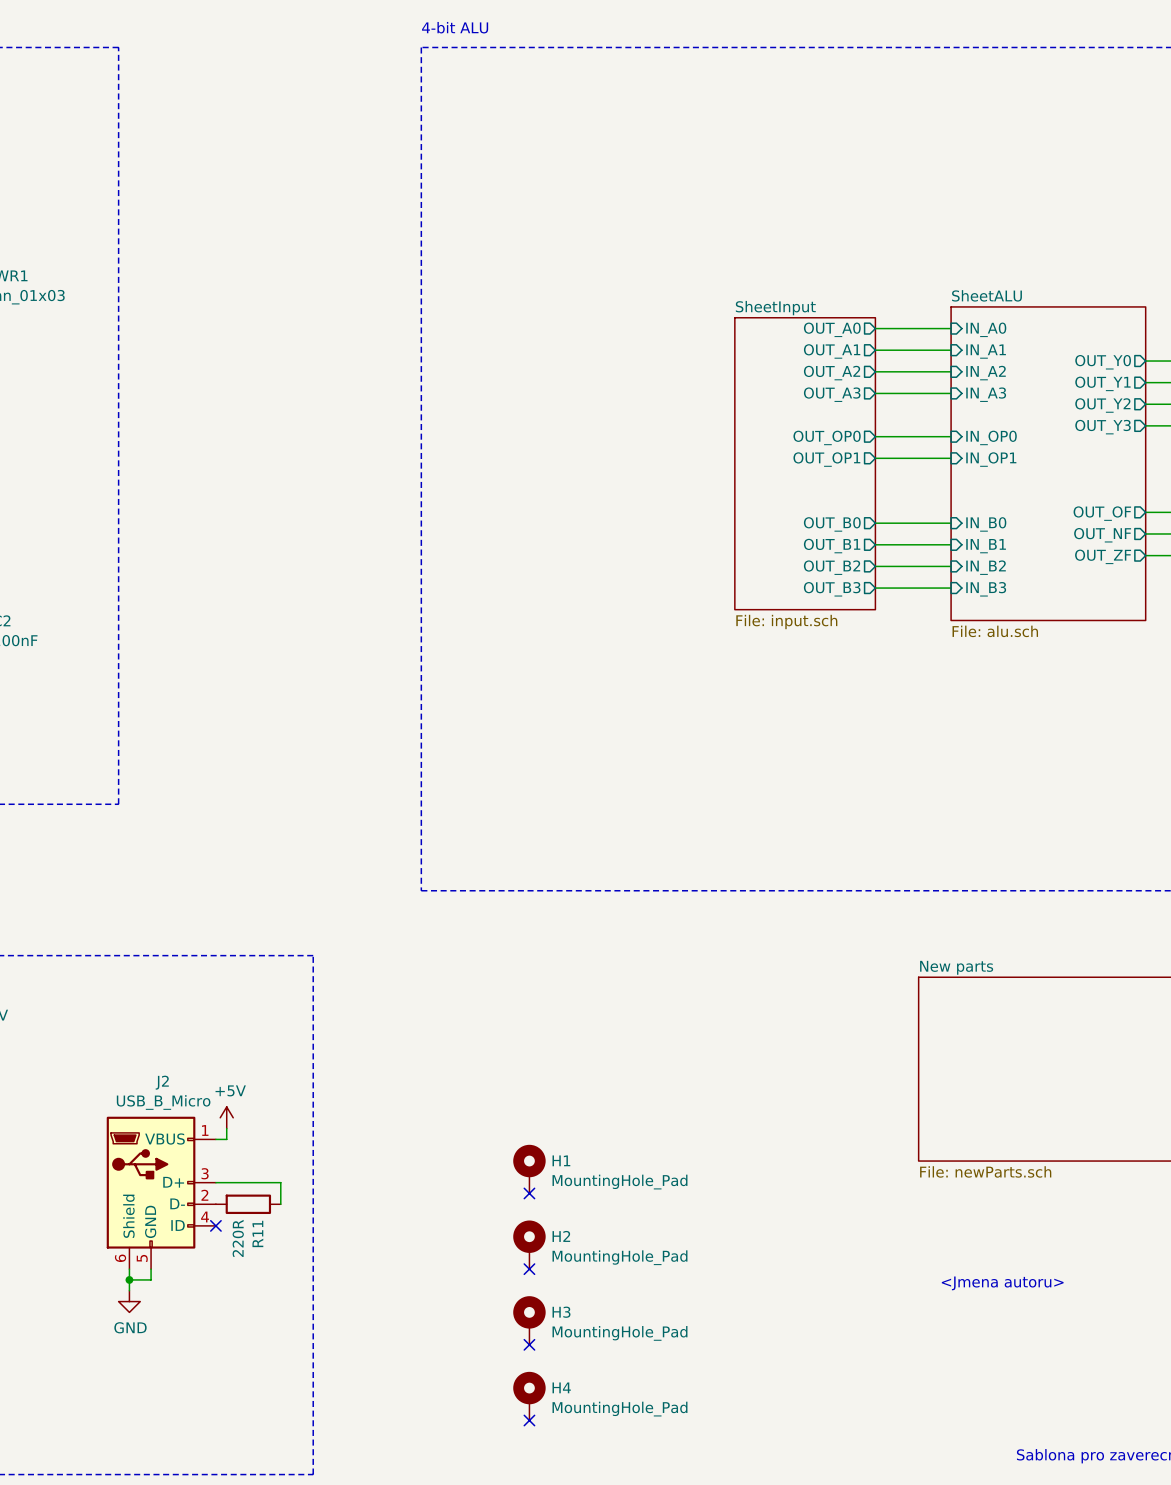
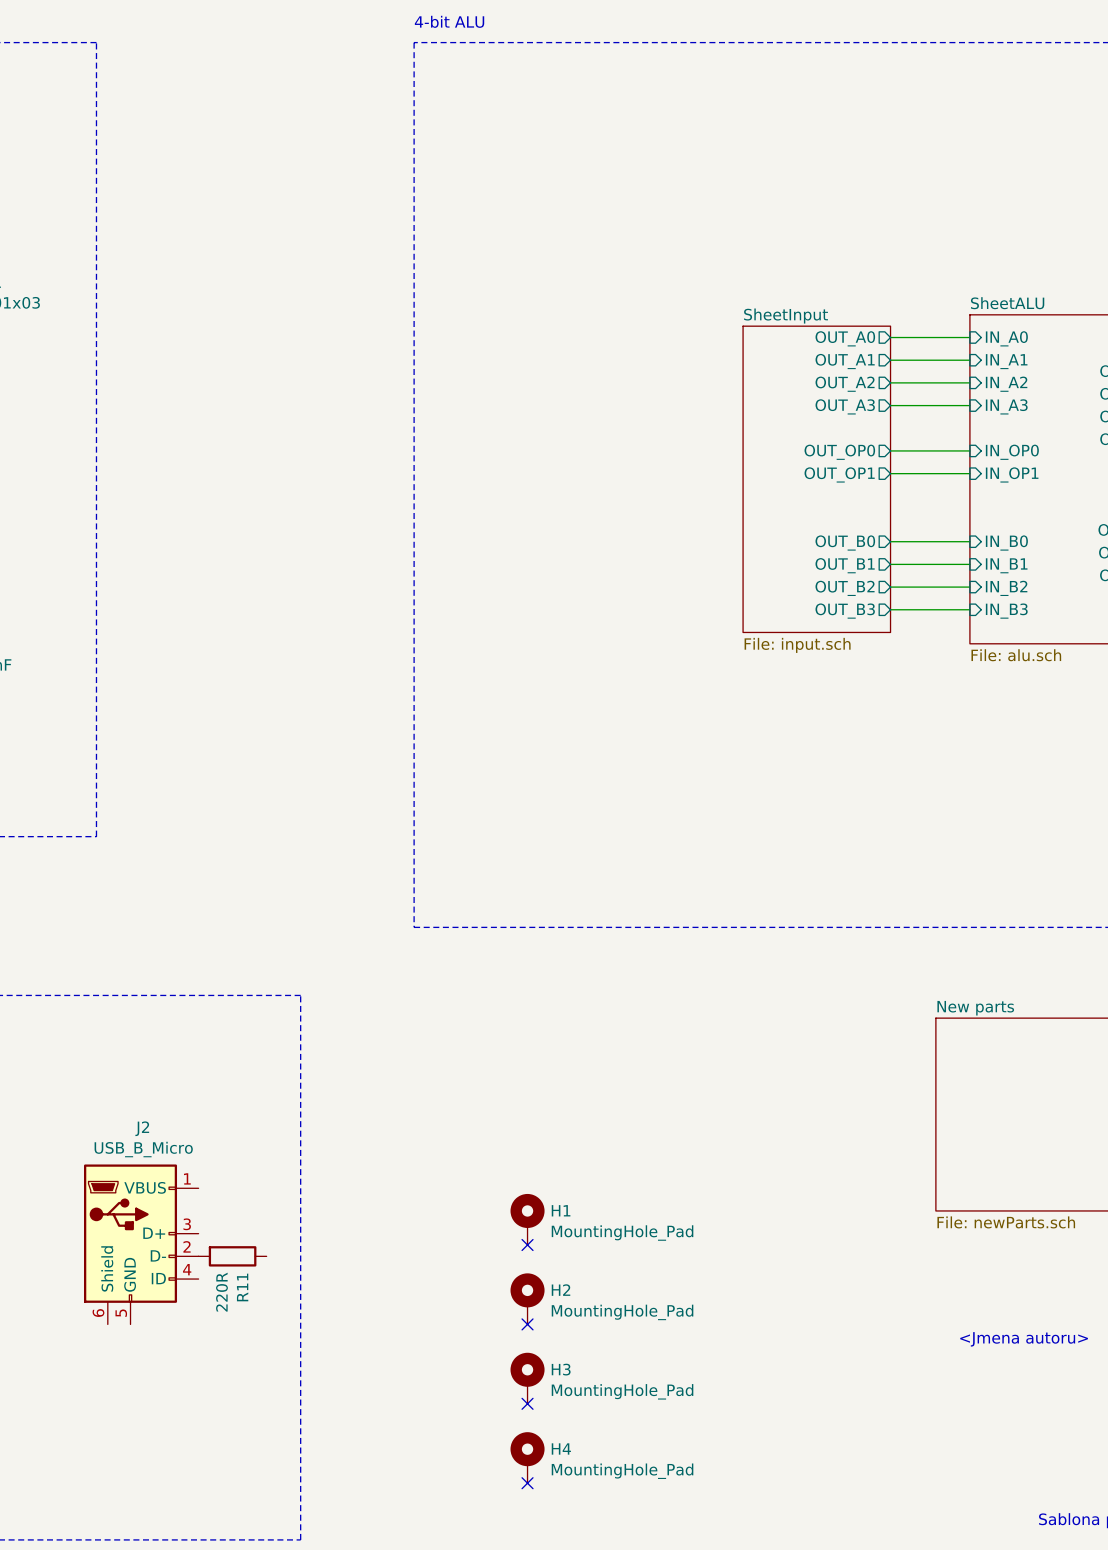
power symbol: +5V (226, 1117) -> none
wire: (226, 1128) (226, 1139) (215, 1139) -> none
wire: (215, 1182) (280, 1182) (280, 1204) -> none
no-connect mark: (215, 1225) -> none
wire: (129, 1269) (129, 1290) -> none
wire: (151, 1269) (151, 1279) (129, 1279) -> none
junction: (129, 1279) -> none
power symbol: GND (129, 1301) -> none

